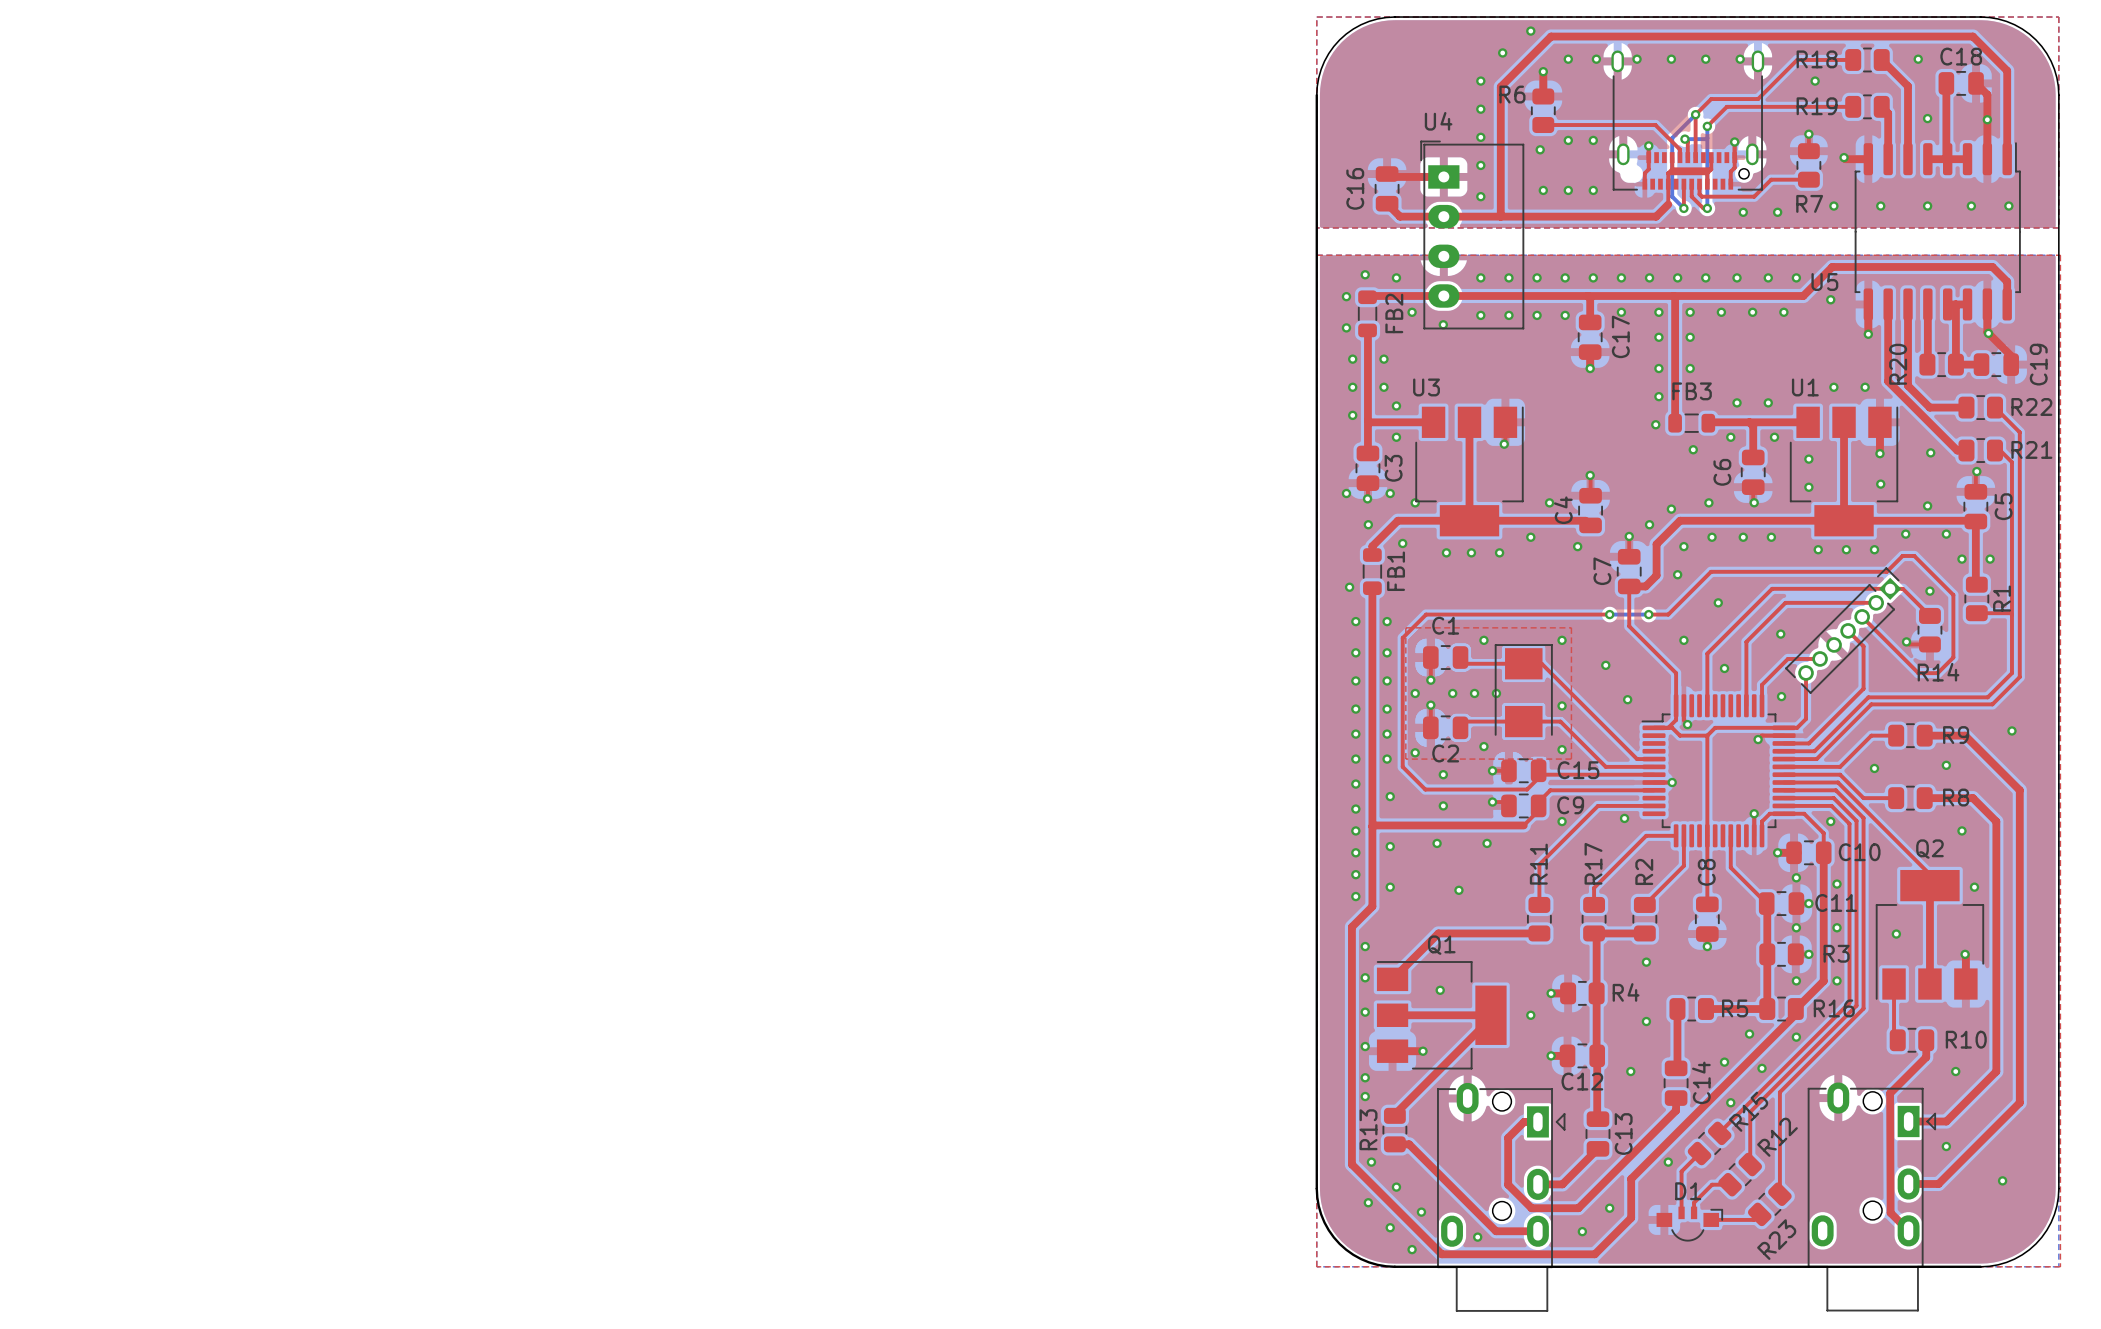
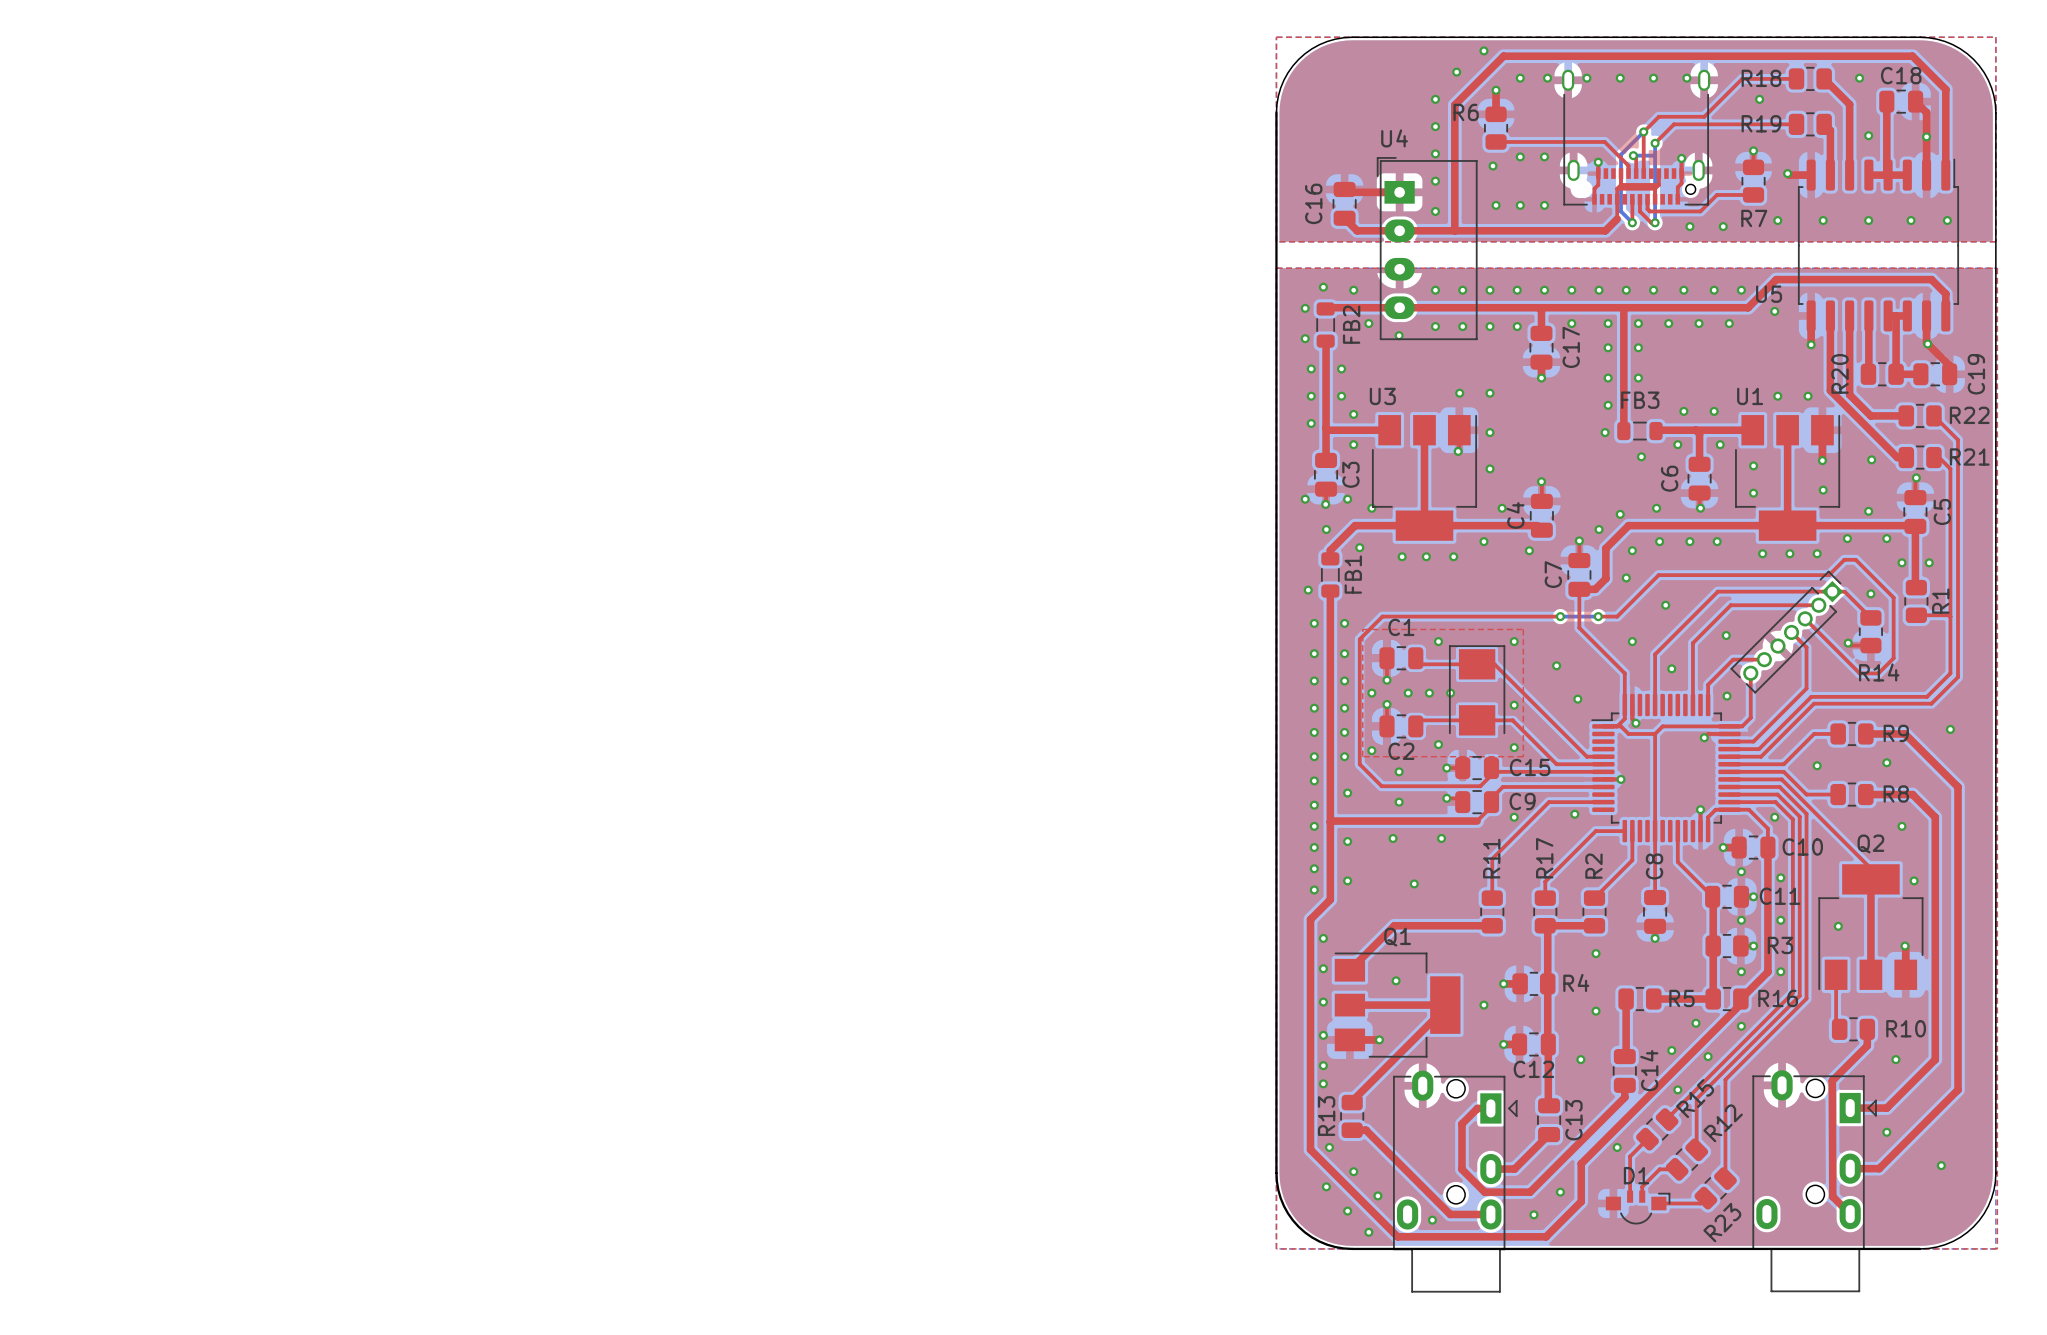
via: none -> (1459, 393)
via: none -> (1490, 393)
via: none -> (1490, 432)
via: none -> (1490, 468)

